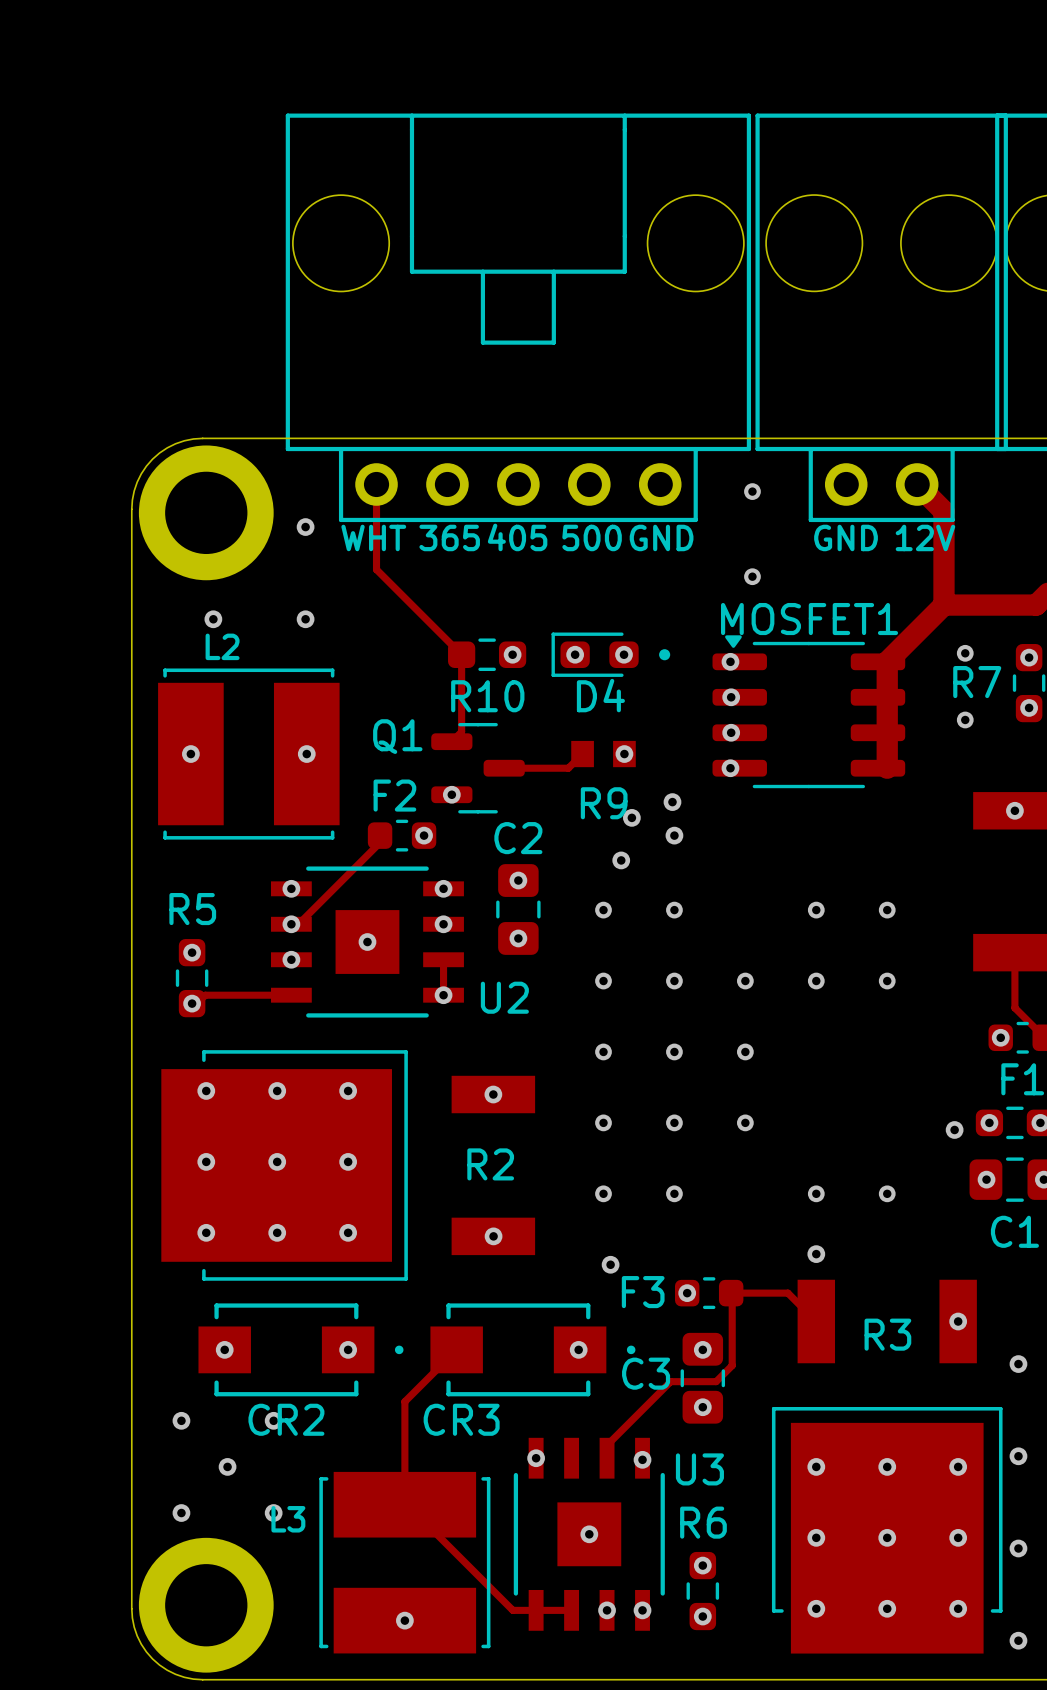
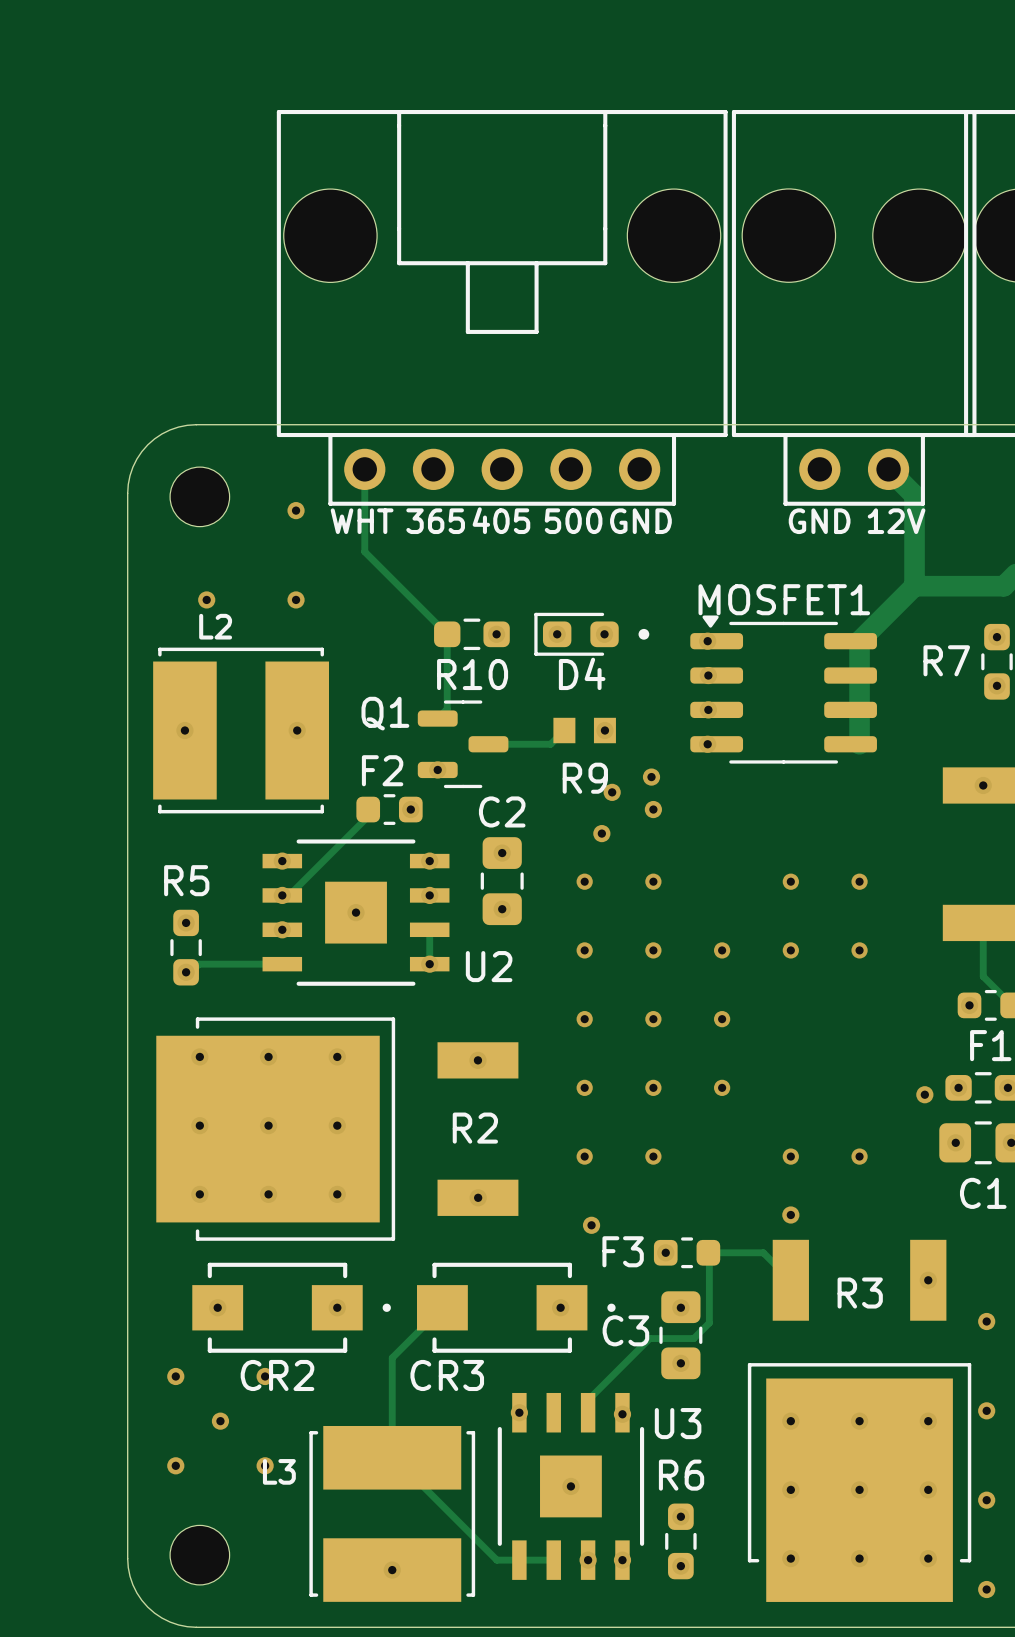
part footprint: [138, 445, 274, 581] -> [170, 467, 230, 527]
via: (752, 491) -> none
via: (752, 576) -> none
via: (965, 653) -> none
via: (965, 719) -> none
part footprint: [138, 1537, 274, 1673] -> [170, 1525, 230, 1585]

